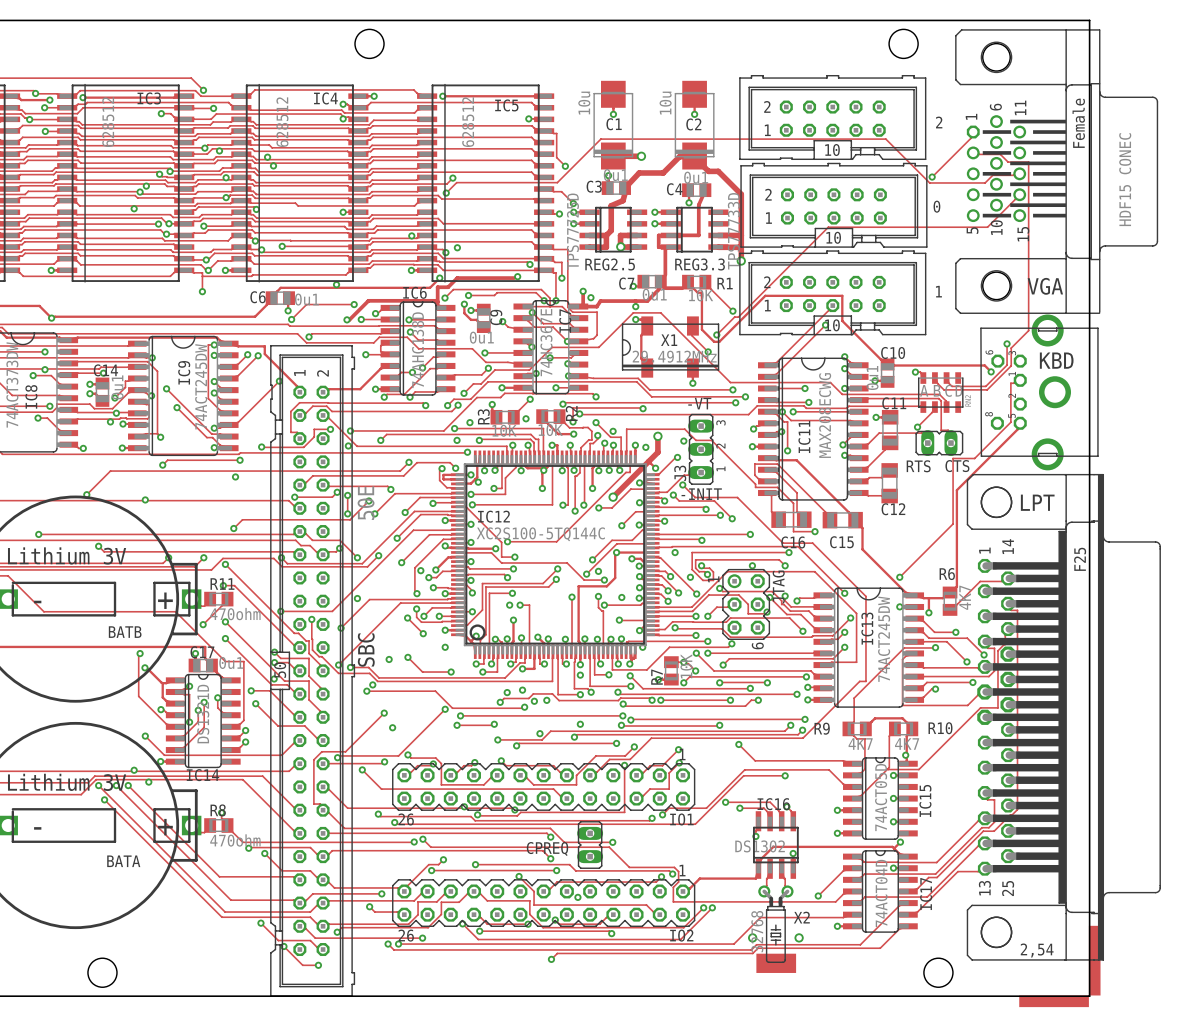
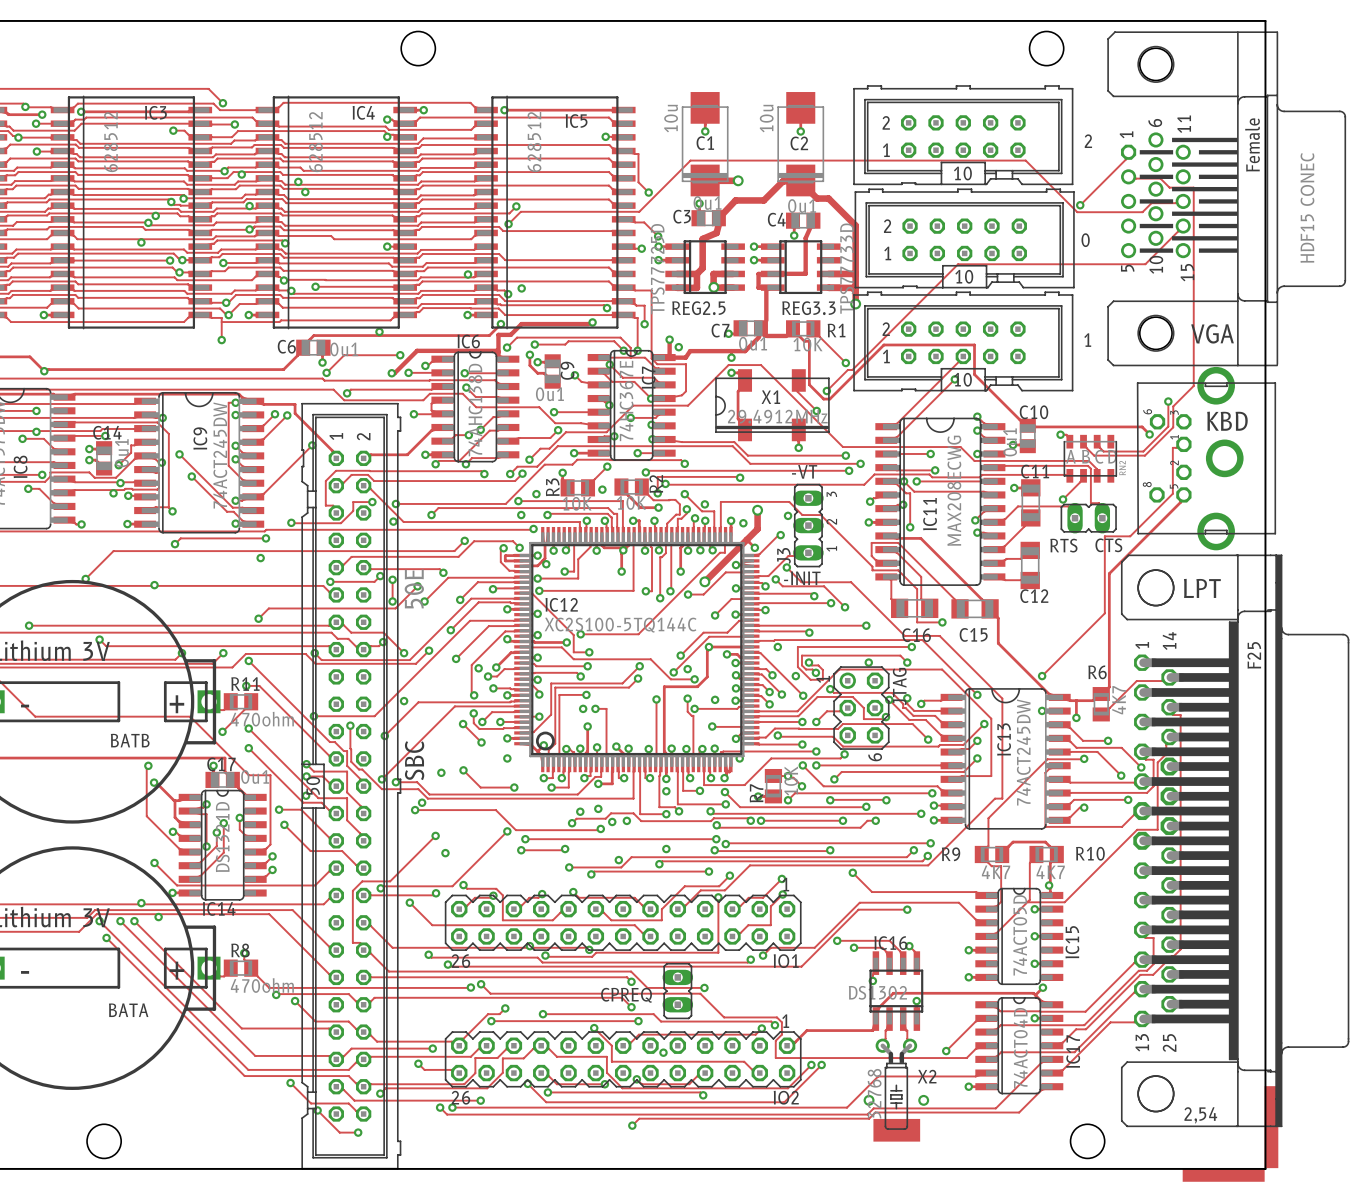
IC7 footprint: [513, 300, 589, 395] -> [587, 349, 676, 461]

